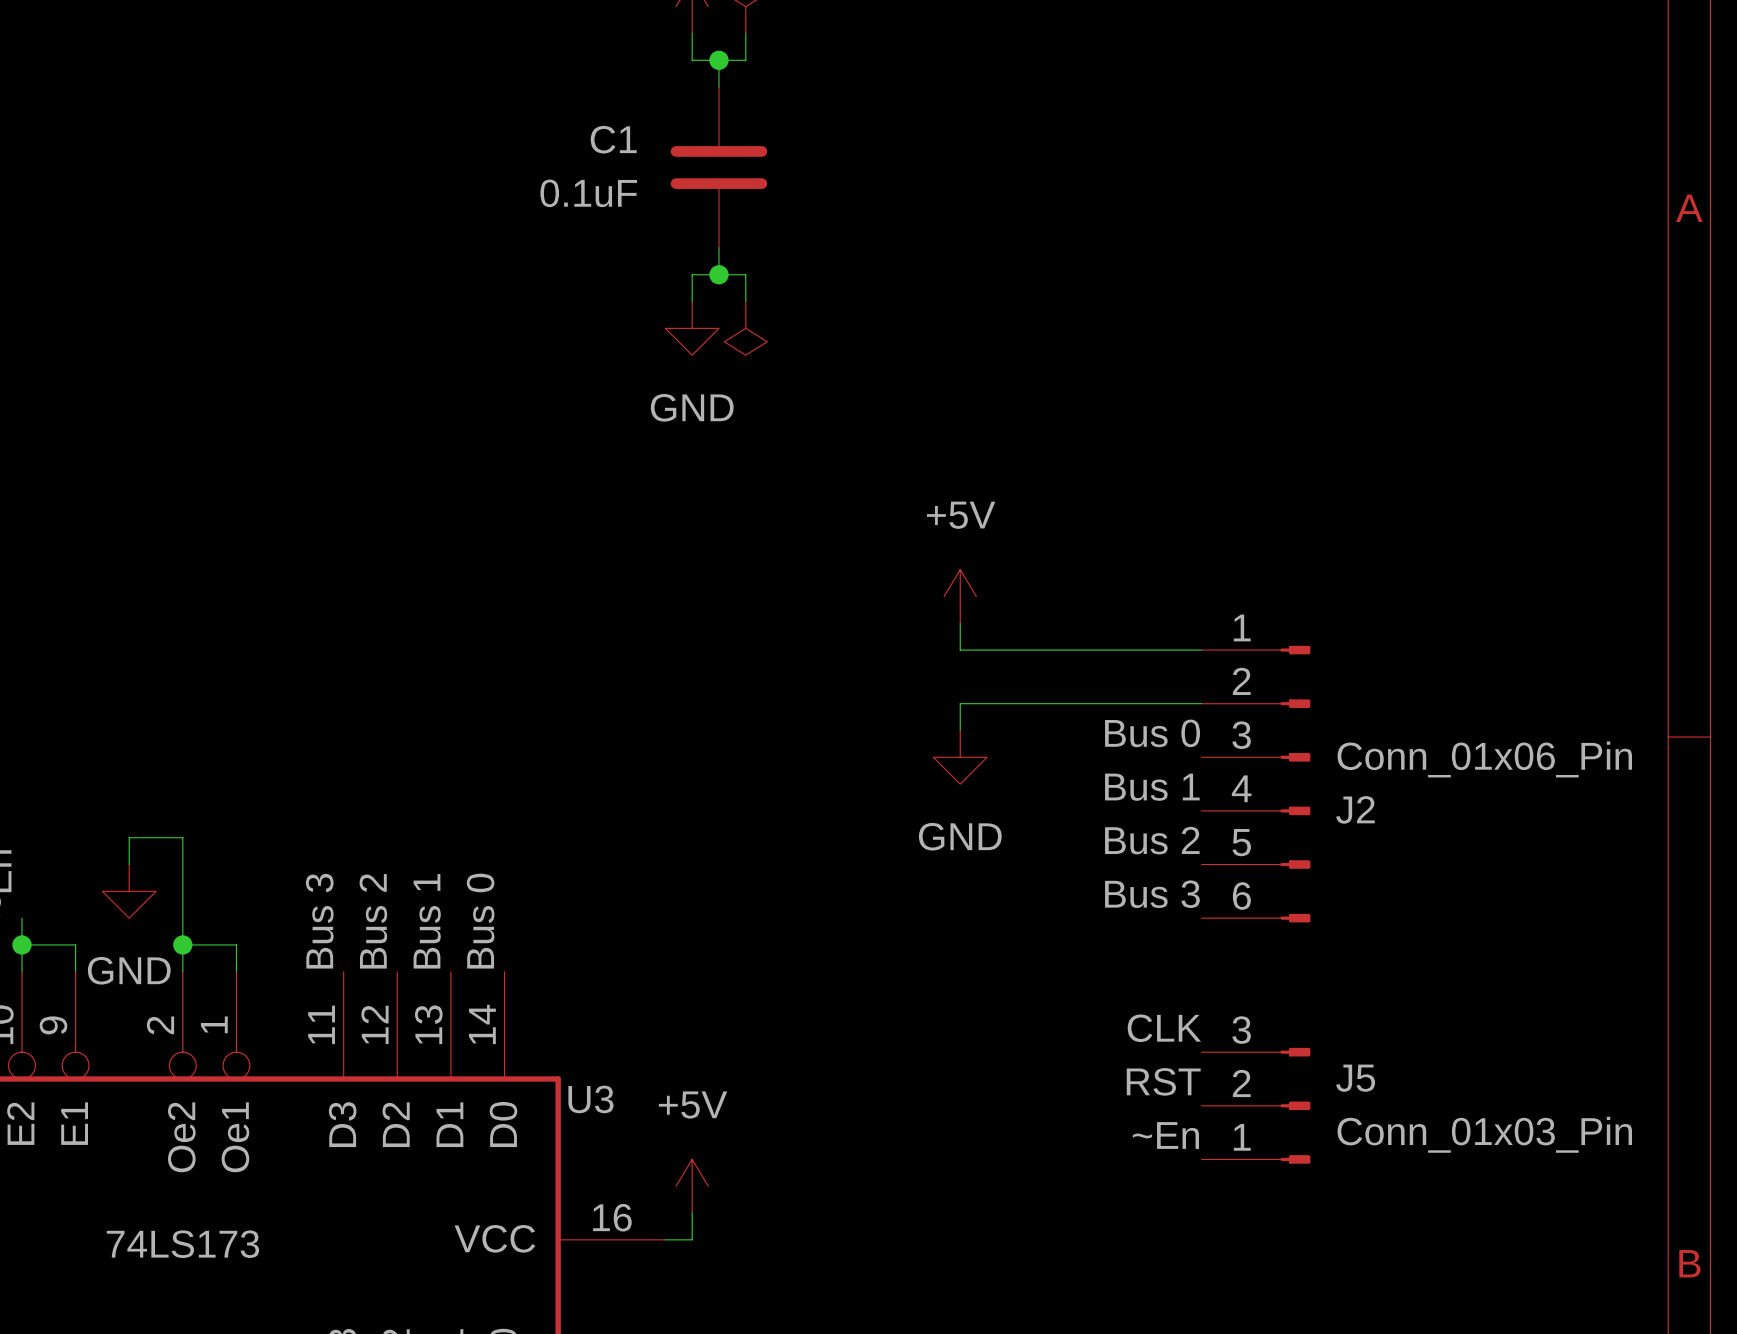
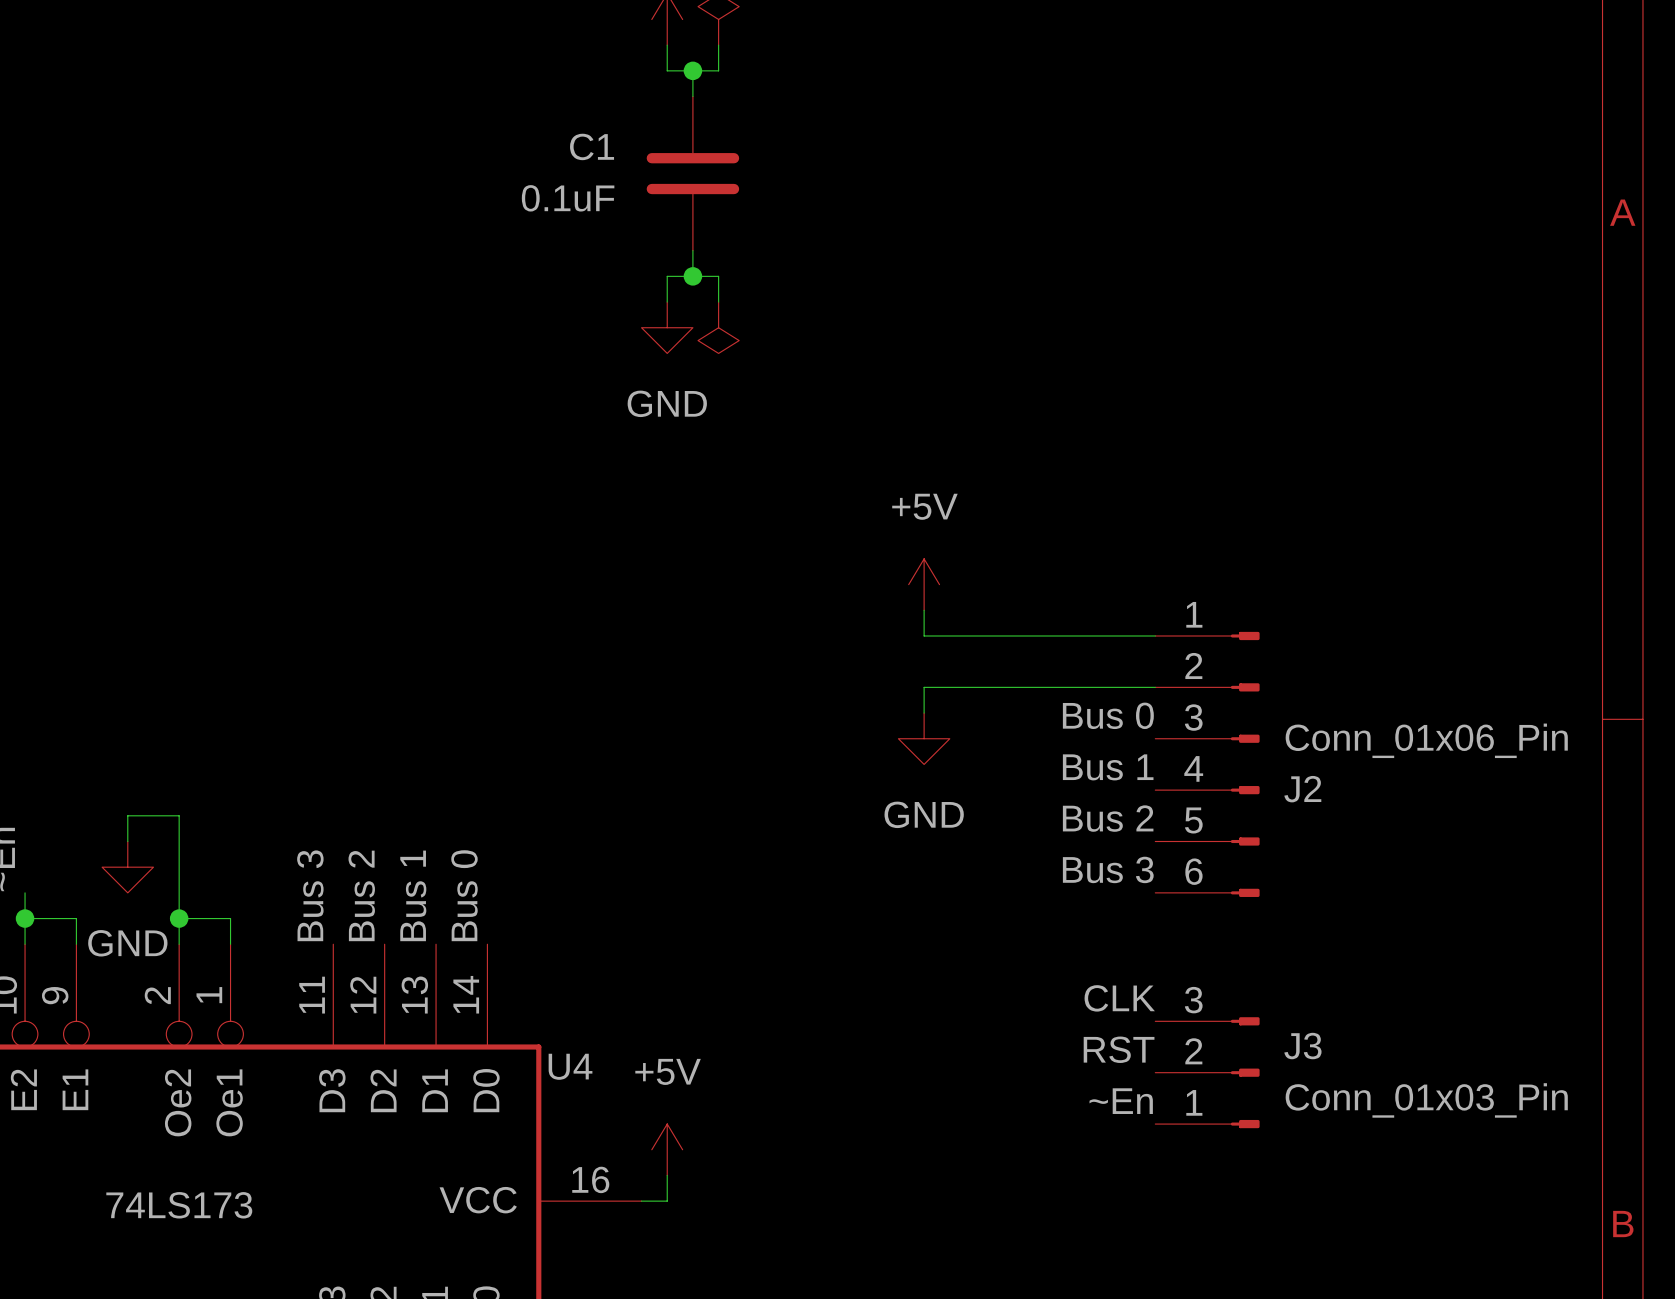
J5 name: J5 (1355, 1078) -> J3 (1302, 1046)
U3 name: U3 (590, 1099) -> U4 (570, 1066)

